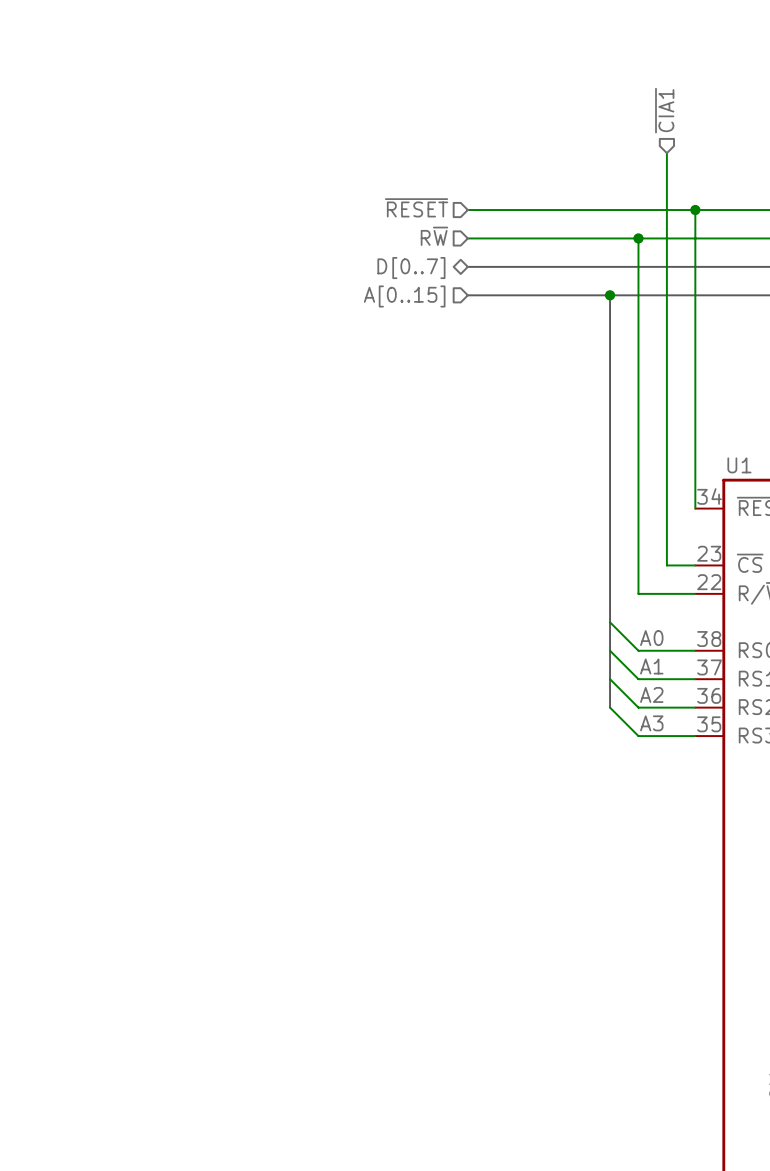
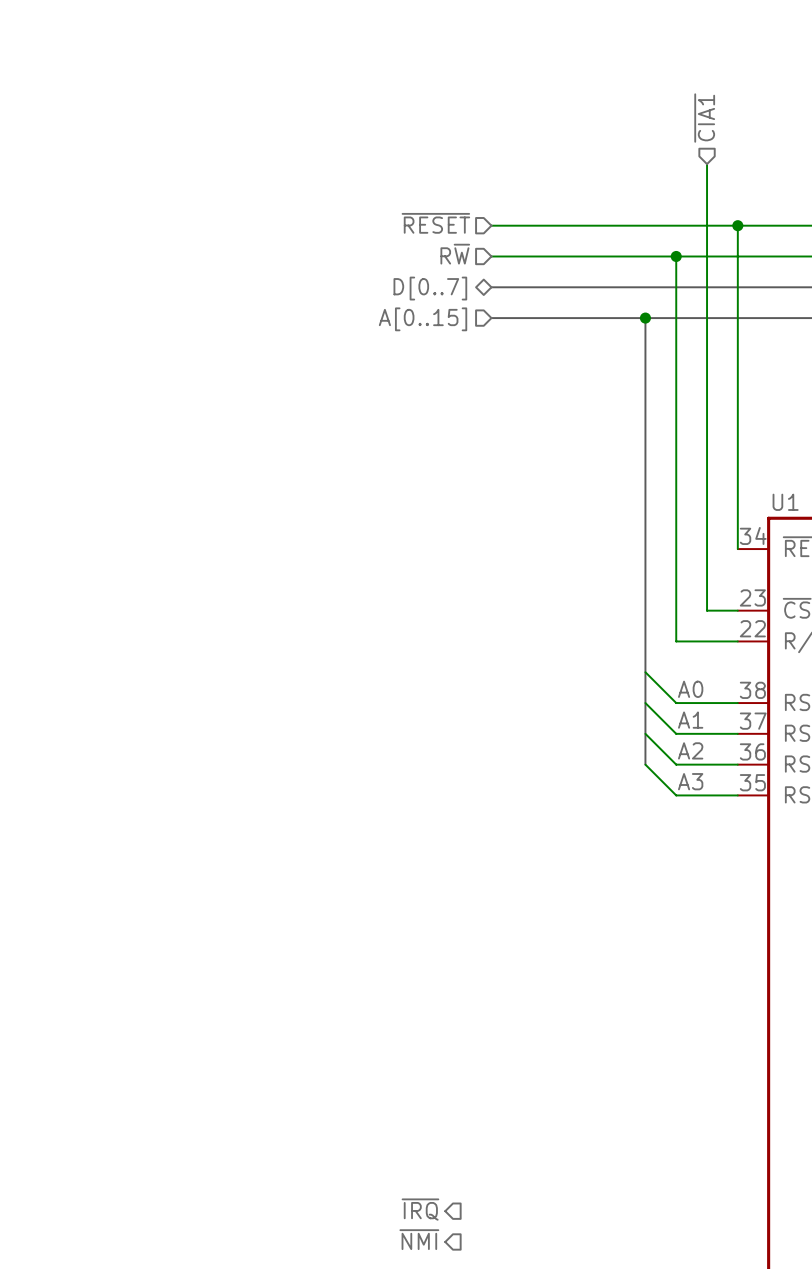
hierarchical label: none -> ~{IRQ} (420, 1209)
hierarchical label: none -> ~{NMI} (419, 1239)

